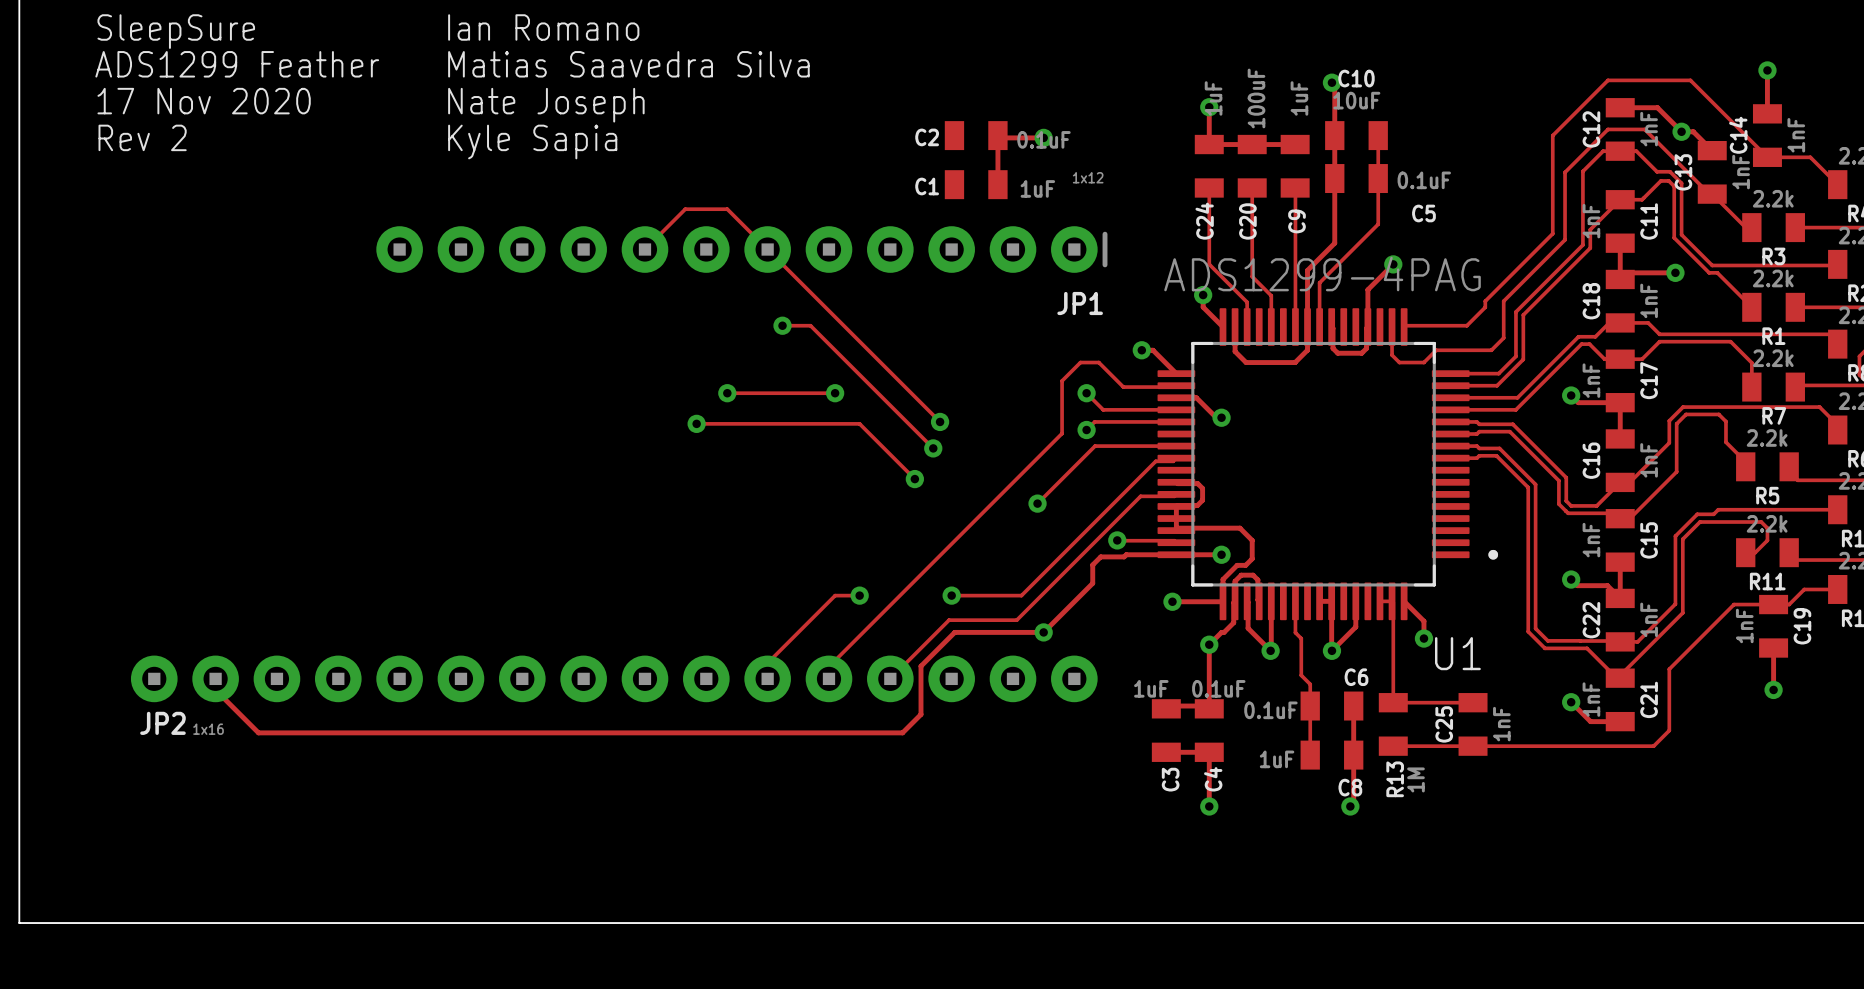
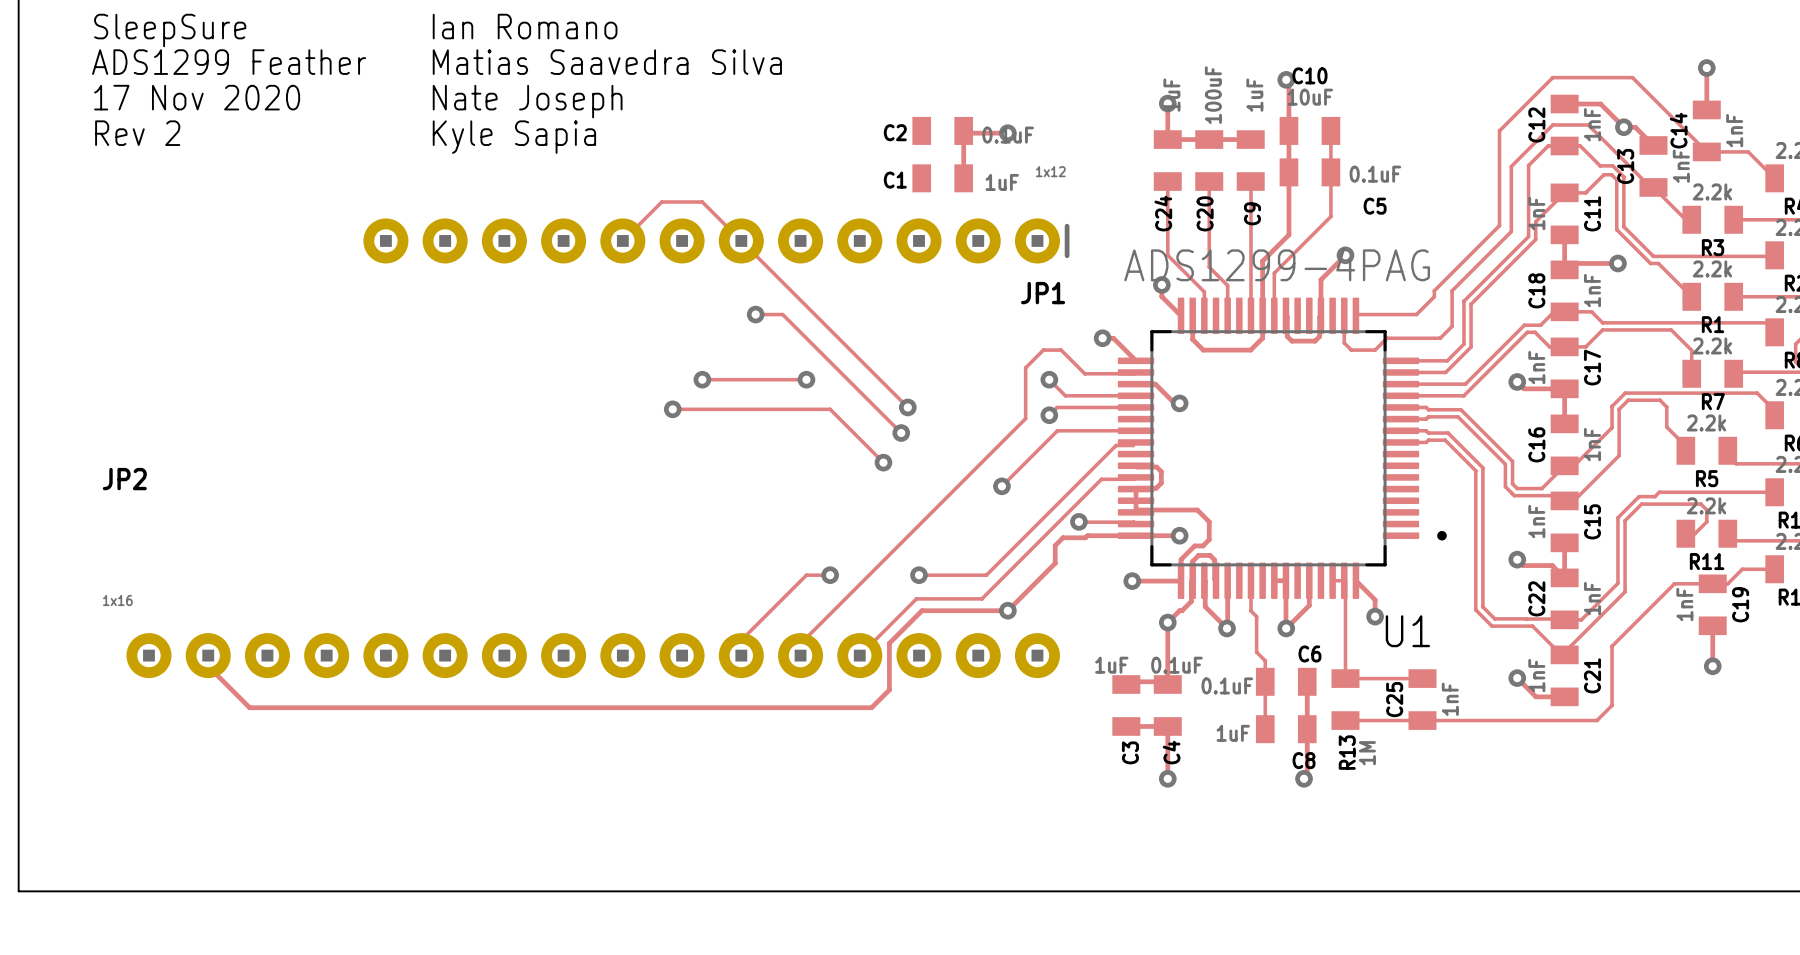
JP2 name position: JP2 (162, 723) -> JP2 (124, 479)
JP2 value position: 1x16 (208, 729) -> 1x16 (117, 600)

